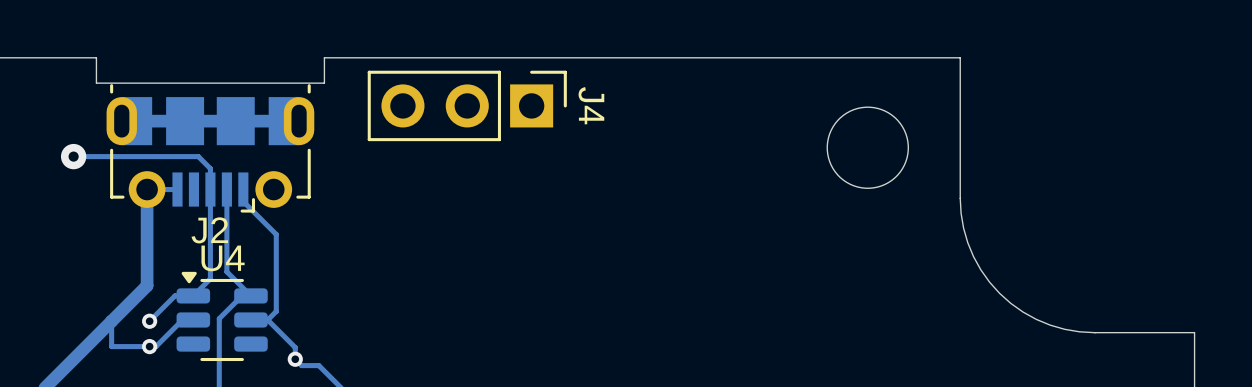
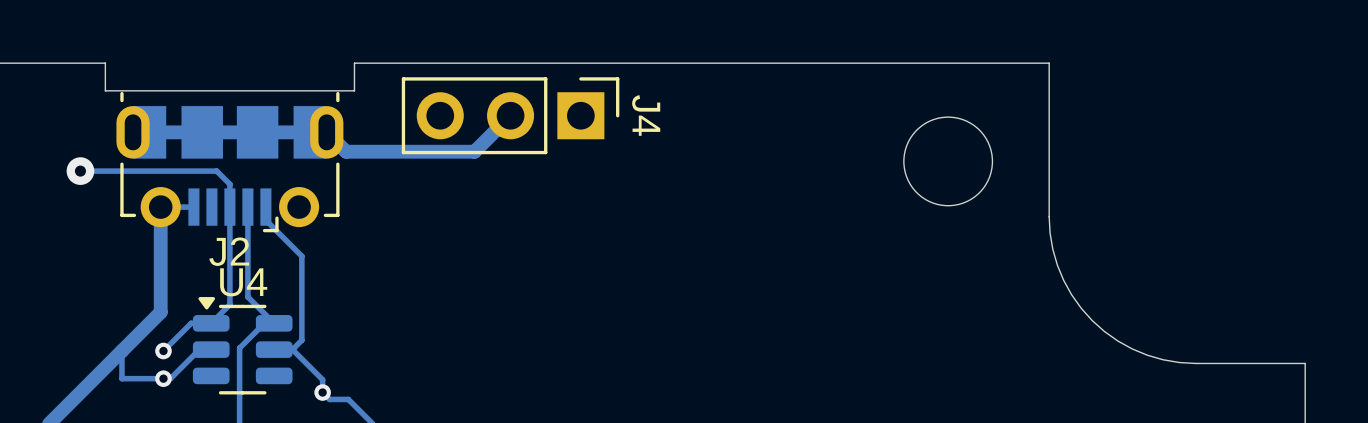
track: none -> (510, 115) (474, 151) (346, 151) (326, 132)

